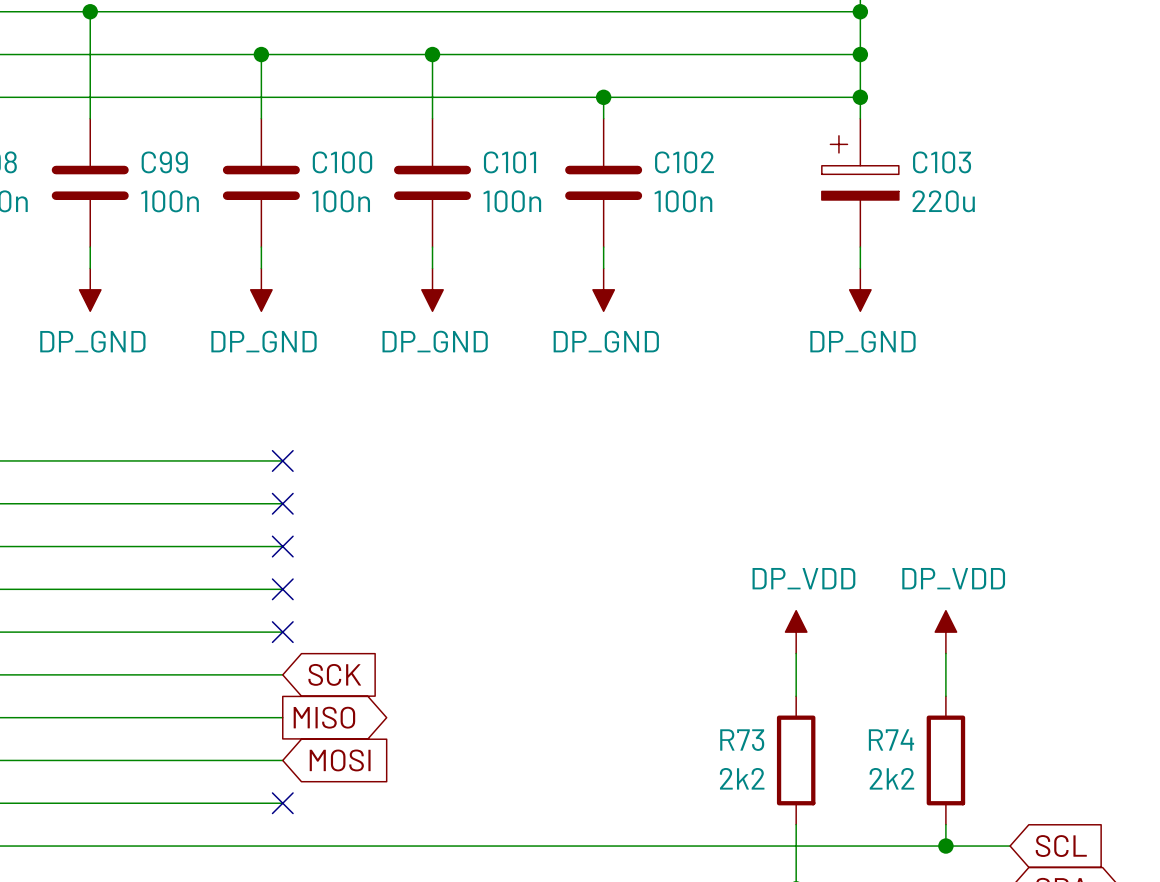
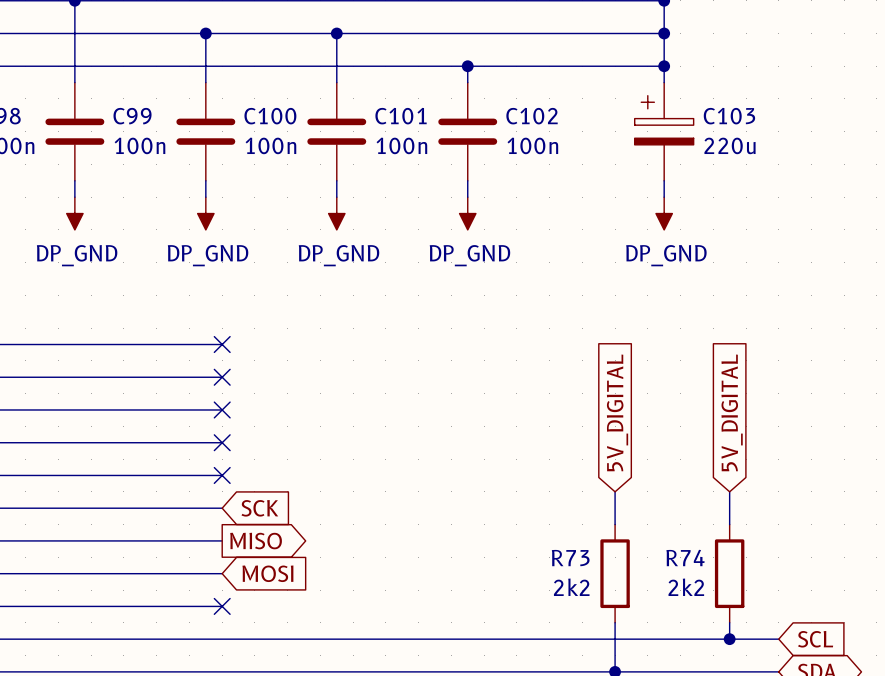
global label: none -> 5V_DIGITAL (617, 412)
global label: none -> 5V_DIGITAL (732, 412)
power symbol: DP_VDD (796, 632) -> none
power symbol: DP_VDD (945, 632) -> none

